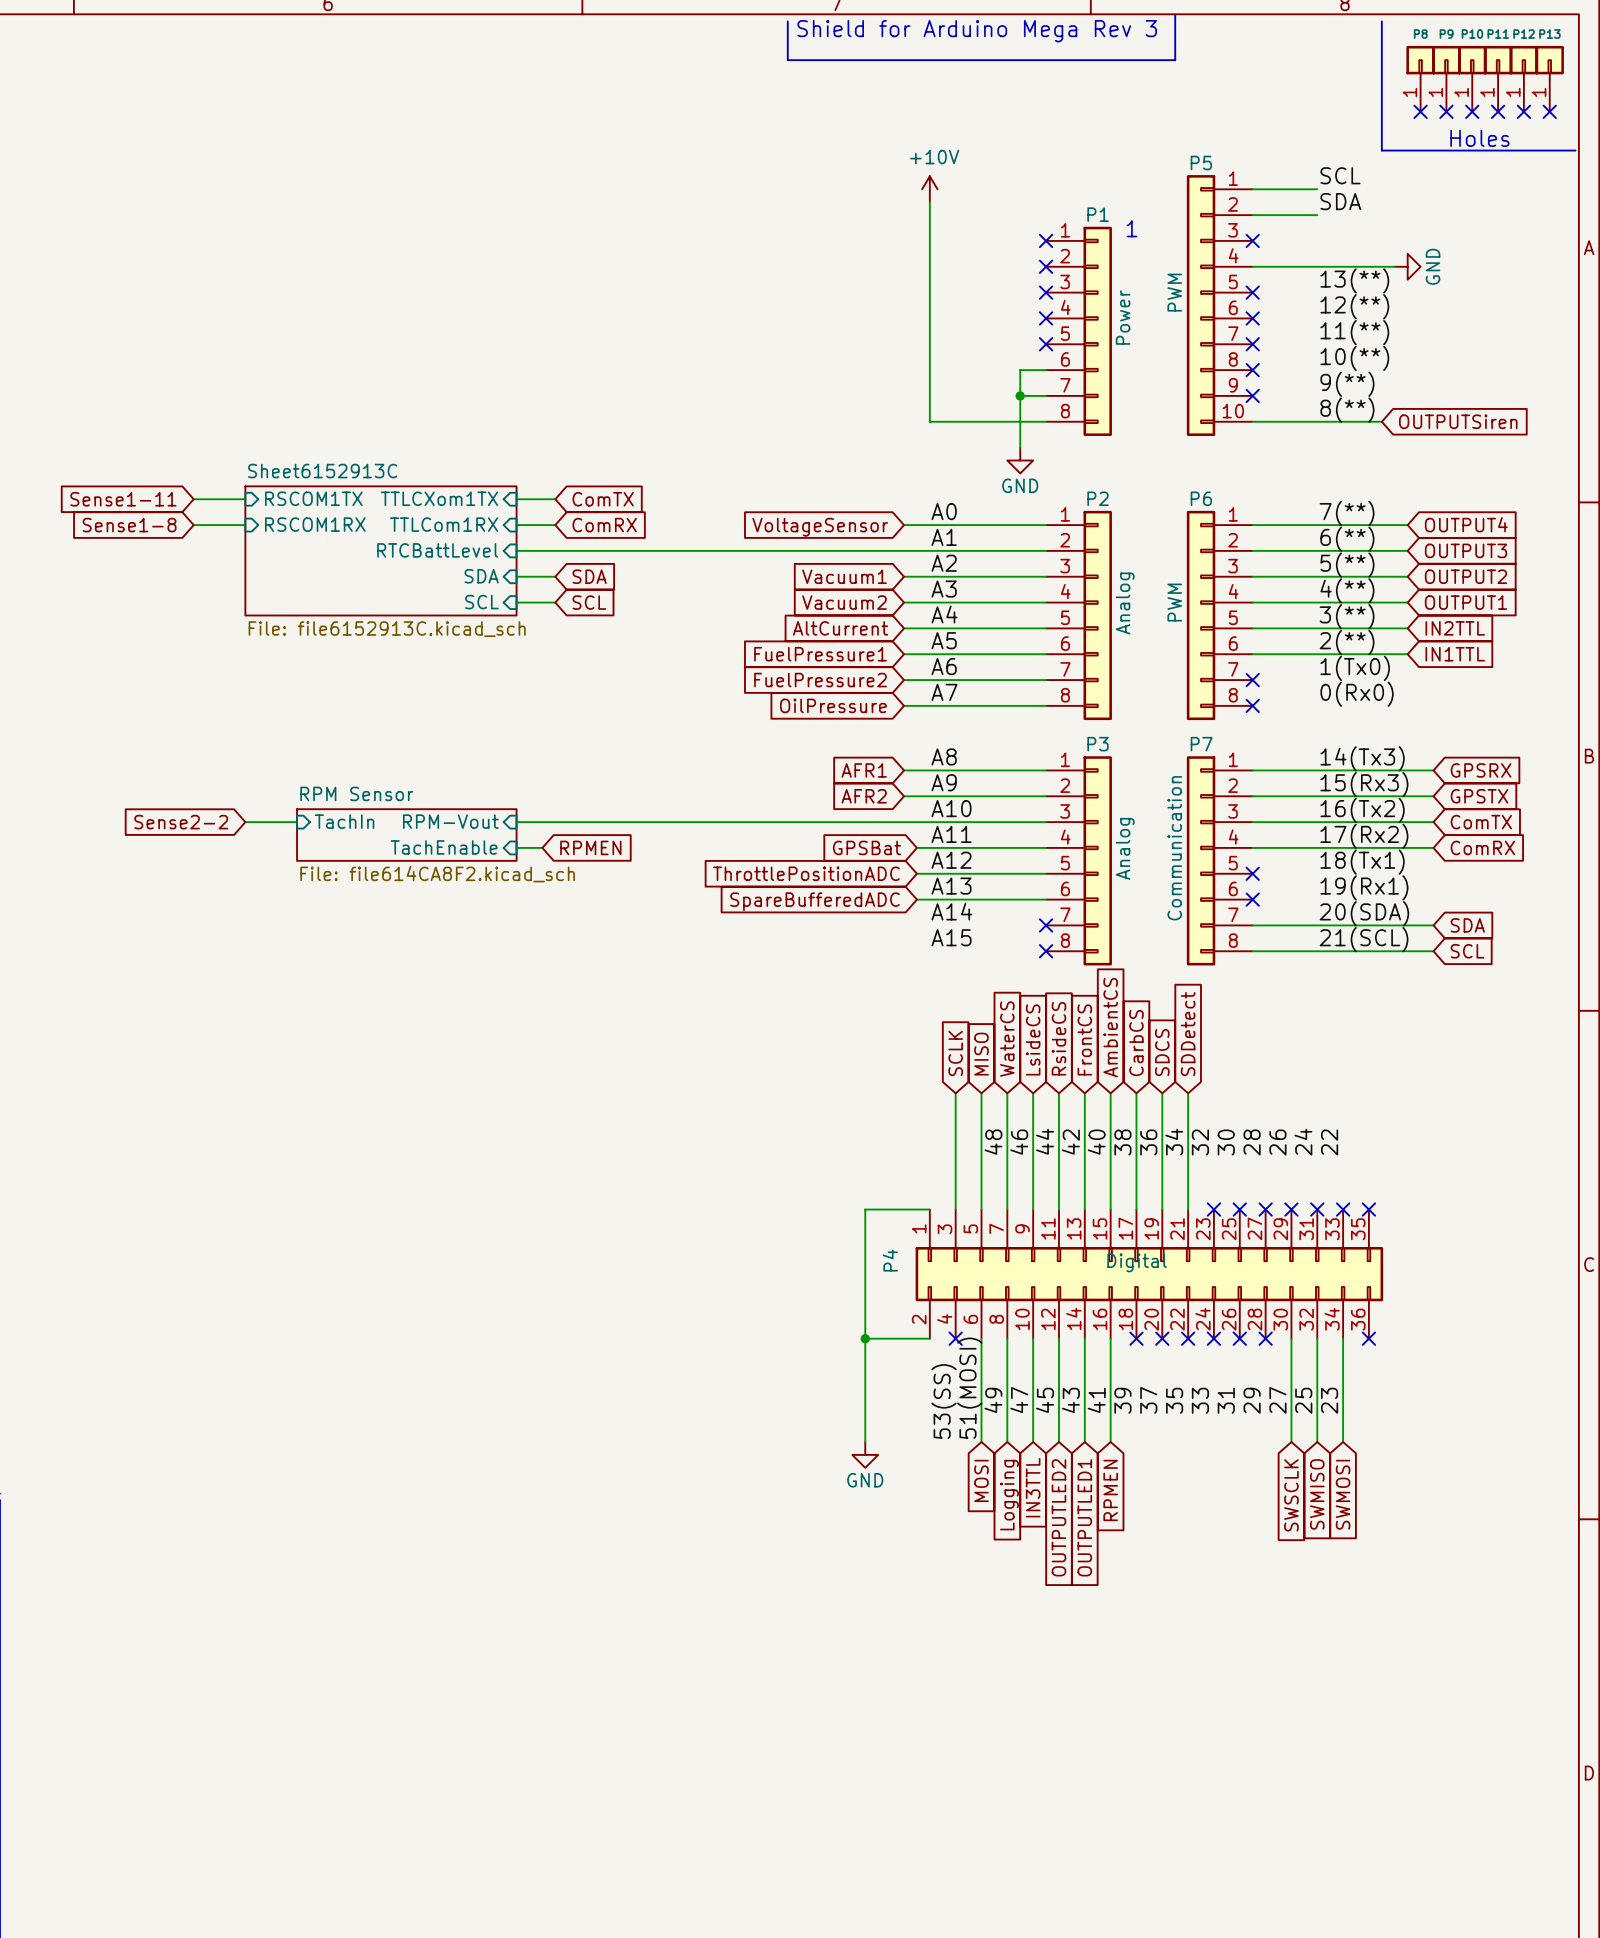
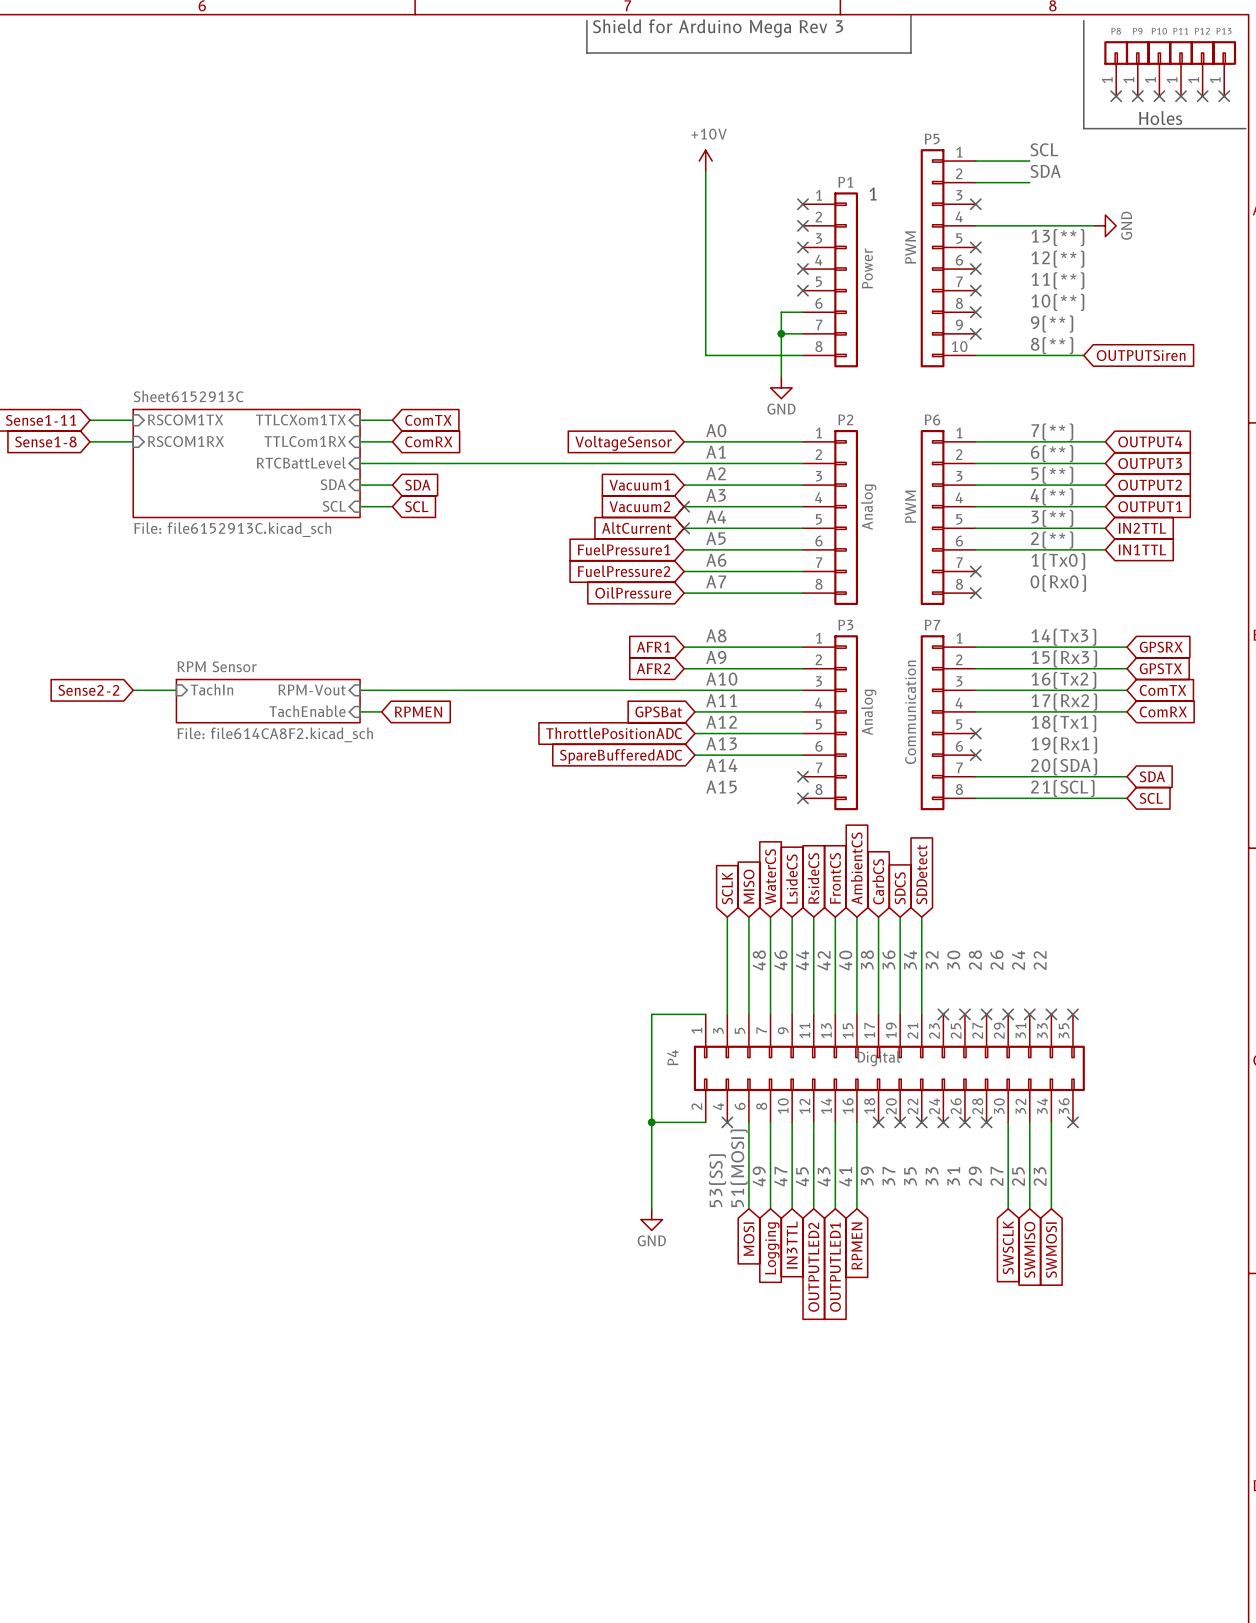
no-connect mark: none -> (684, 506)
no-connect mark: none -> (684, 528)

